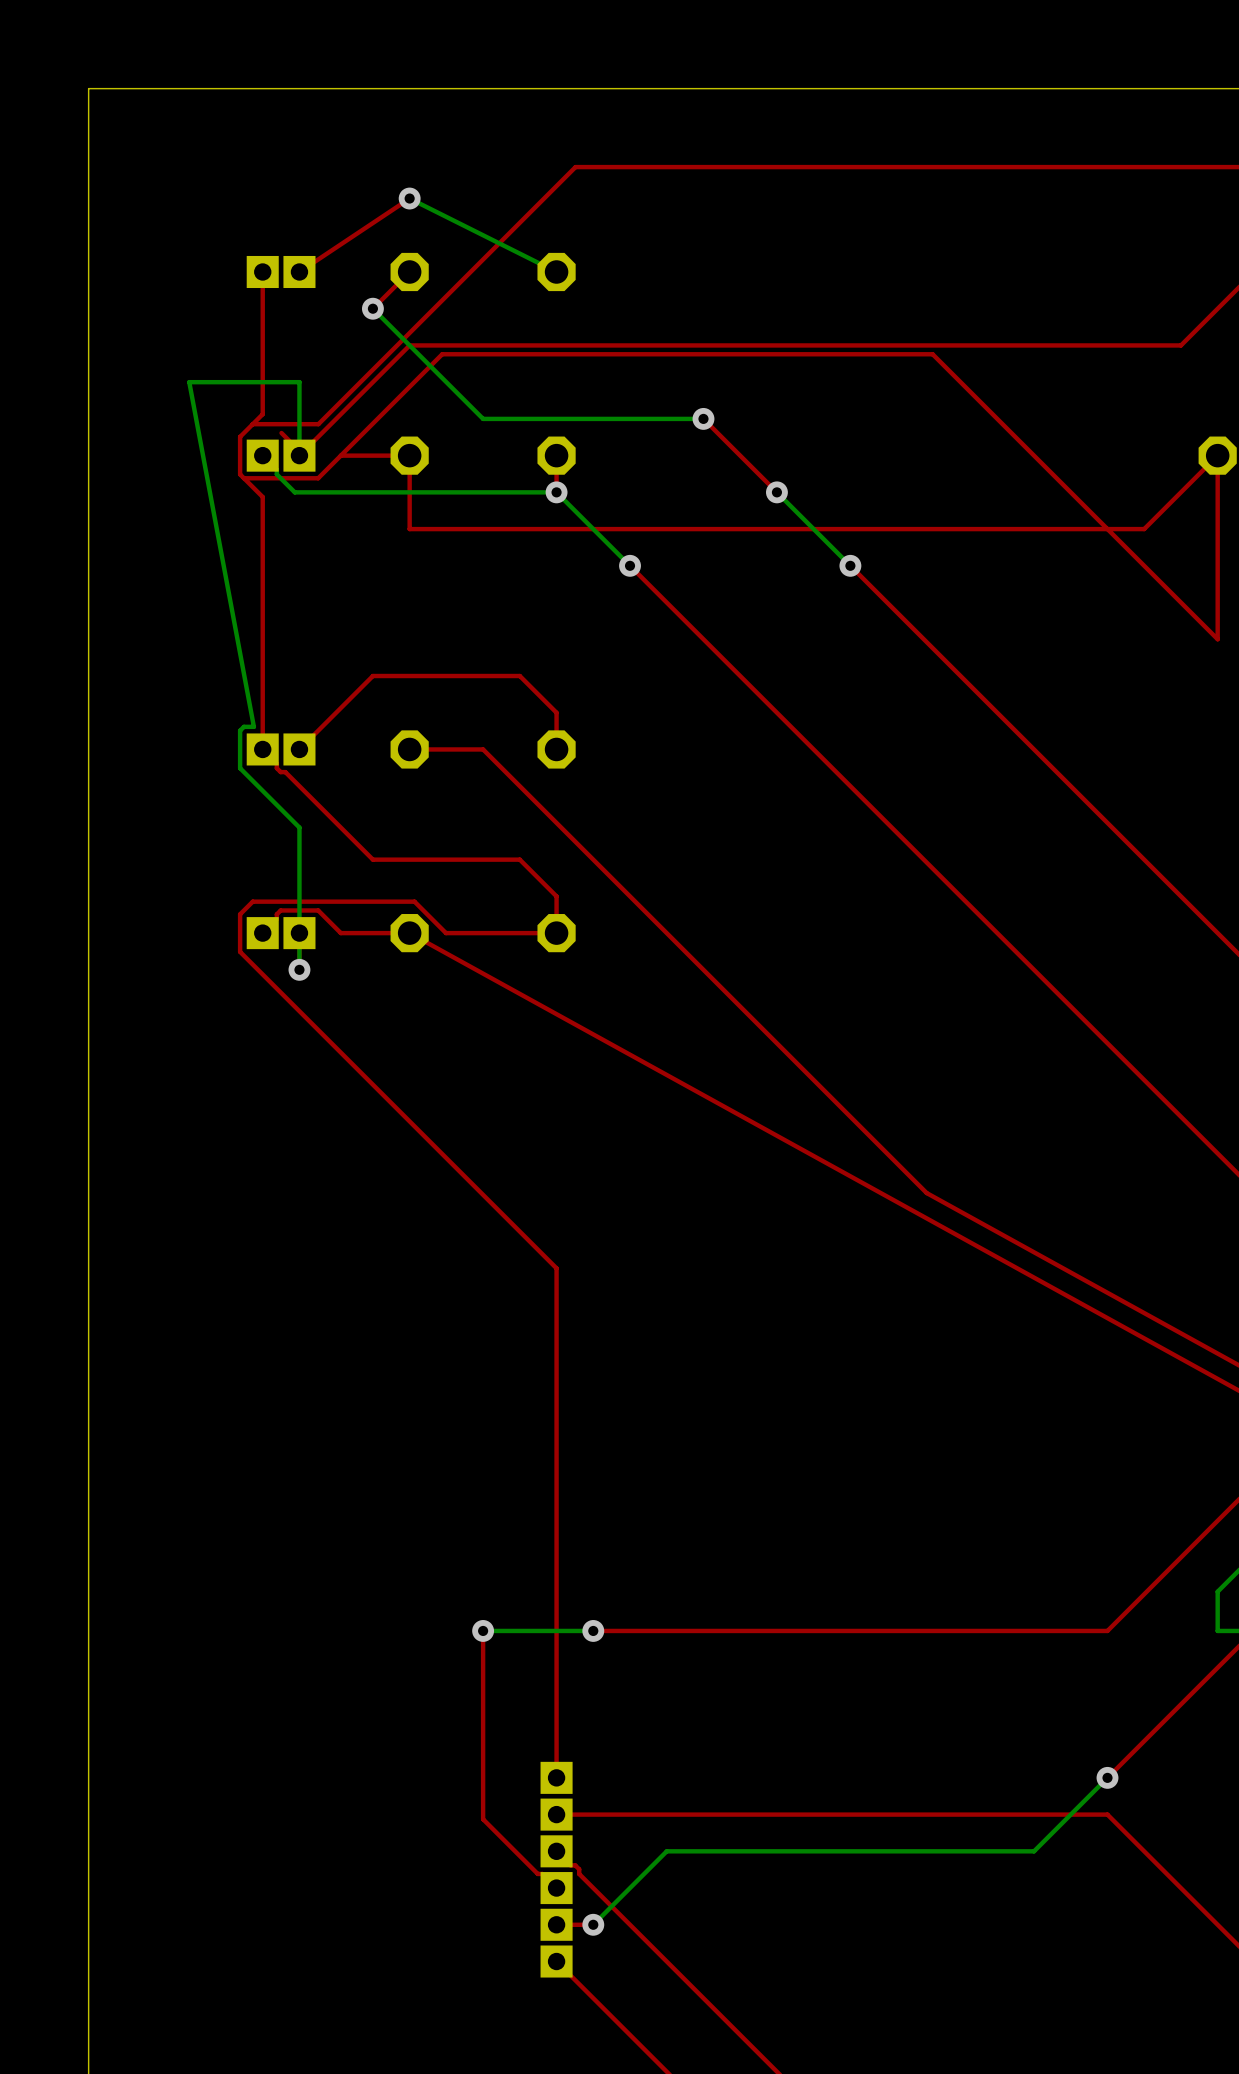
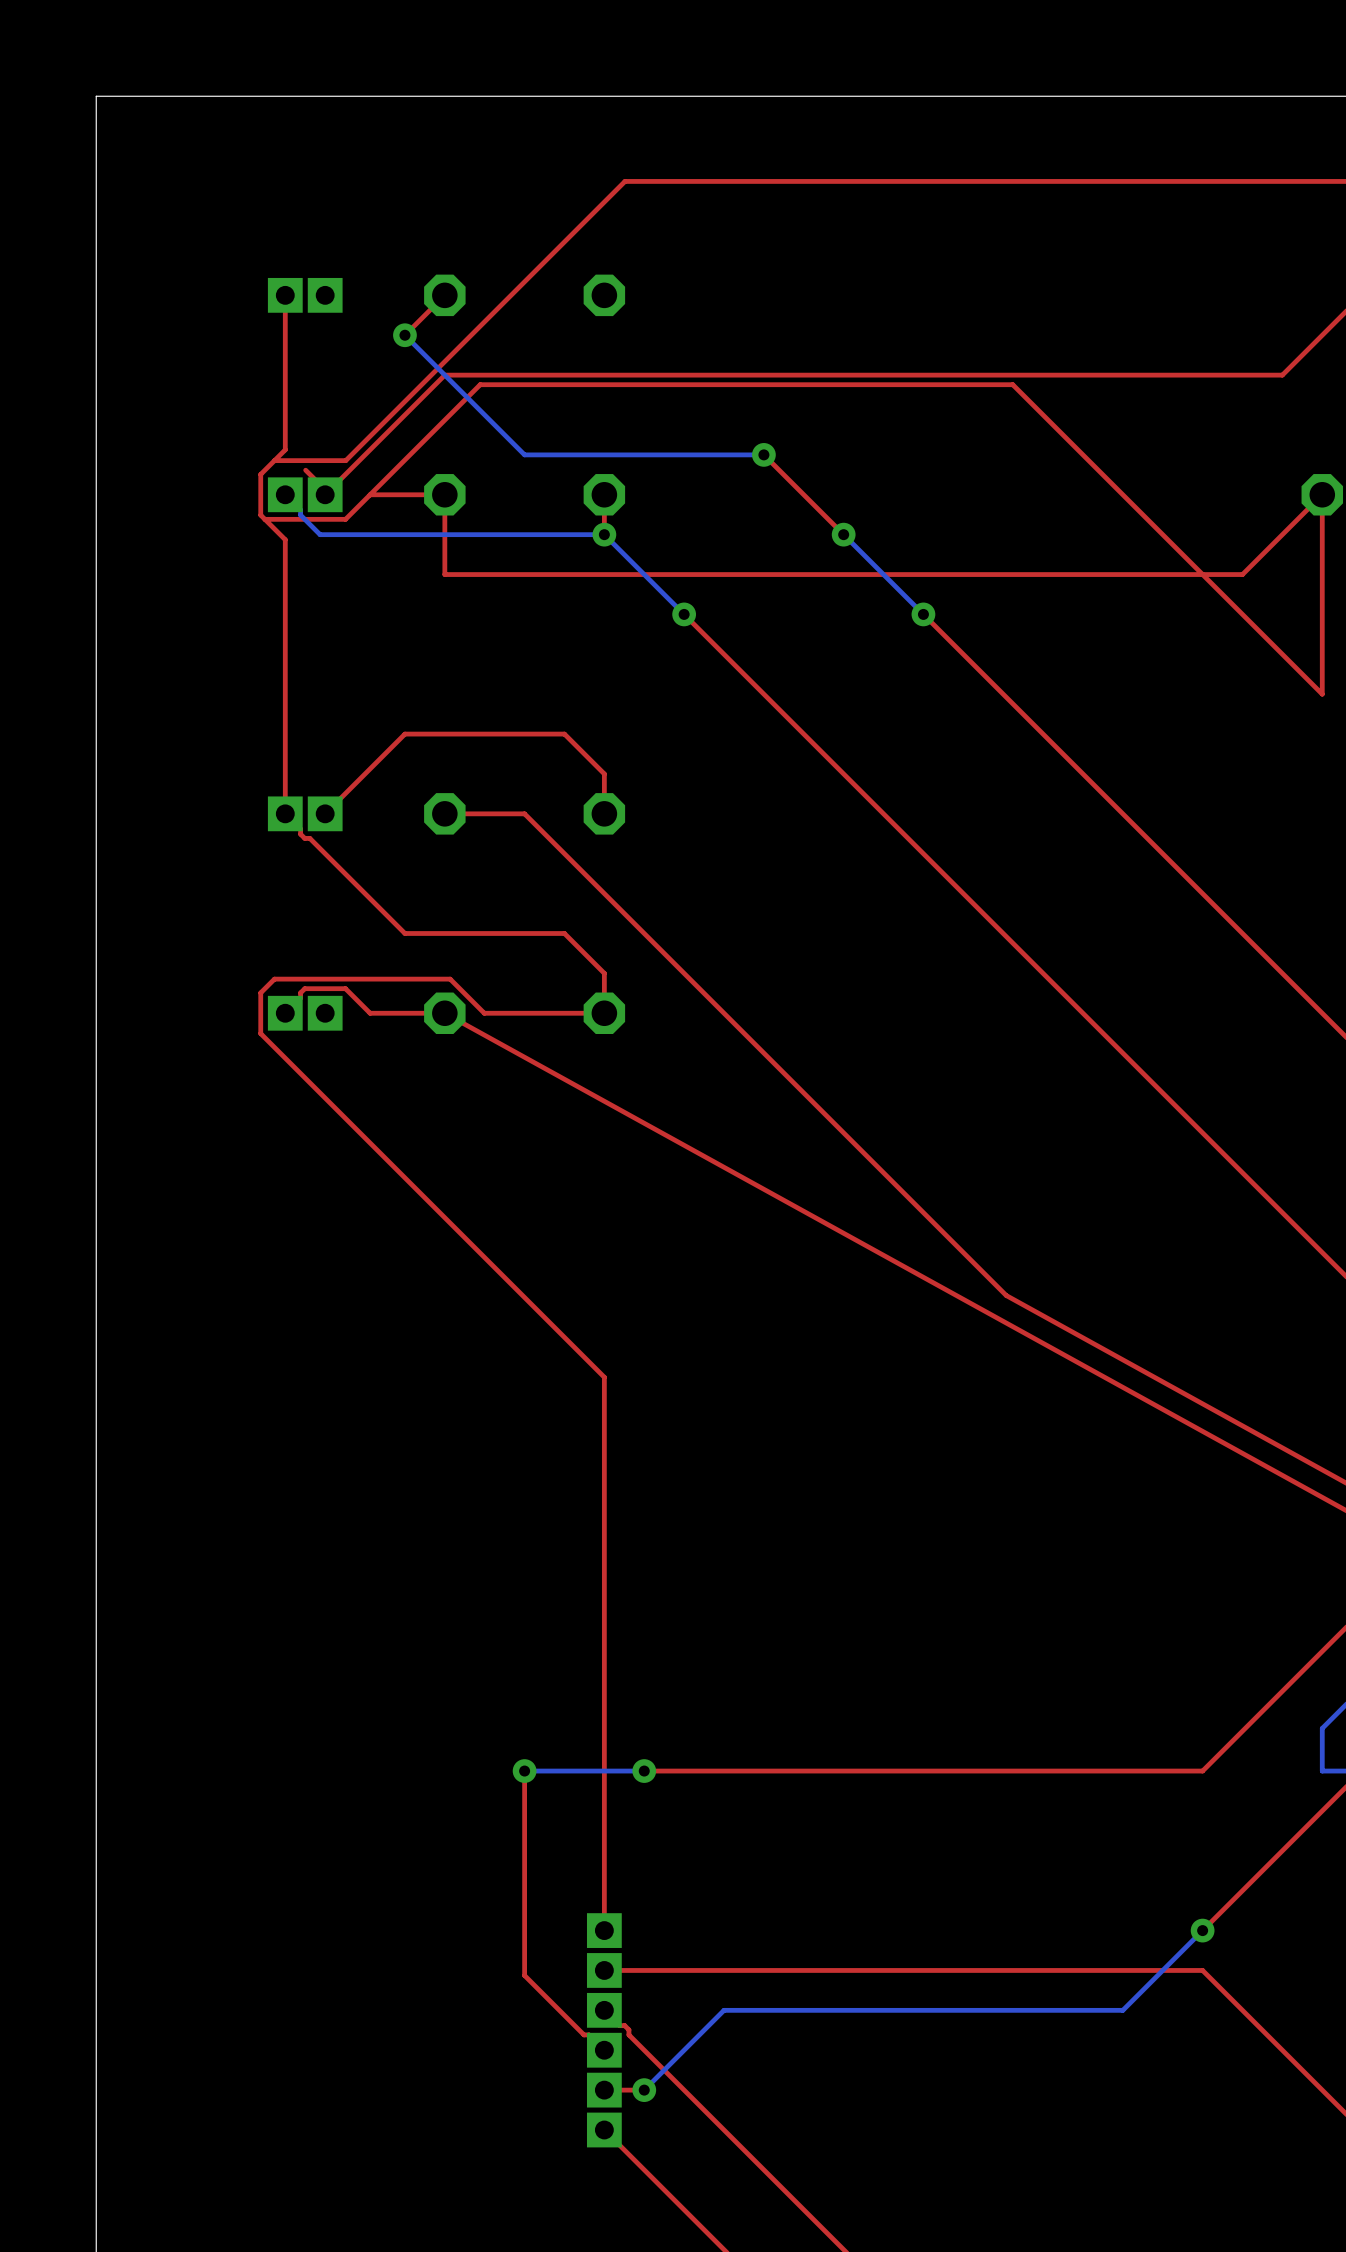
top track: (409, 198) (299, 271) -> none
bottom track: (409, 198) (556, 271) -> none
via: (409, 198) -> none
bottom track: (299, 455) (299, 382) (189, 382) (253, 726) (243, 726) (240, 730) (240, 768) (299, 827) (299, 969) -> none
via: (299, 969) -> none

